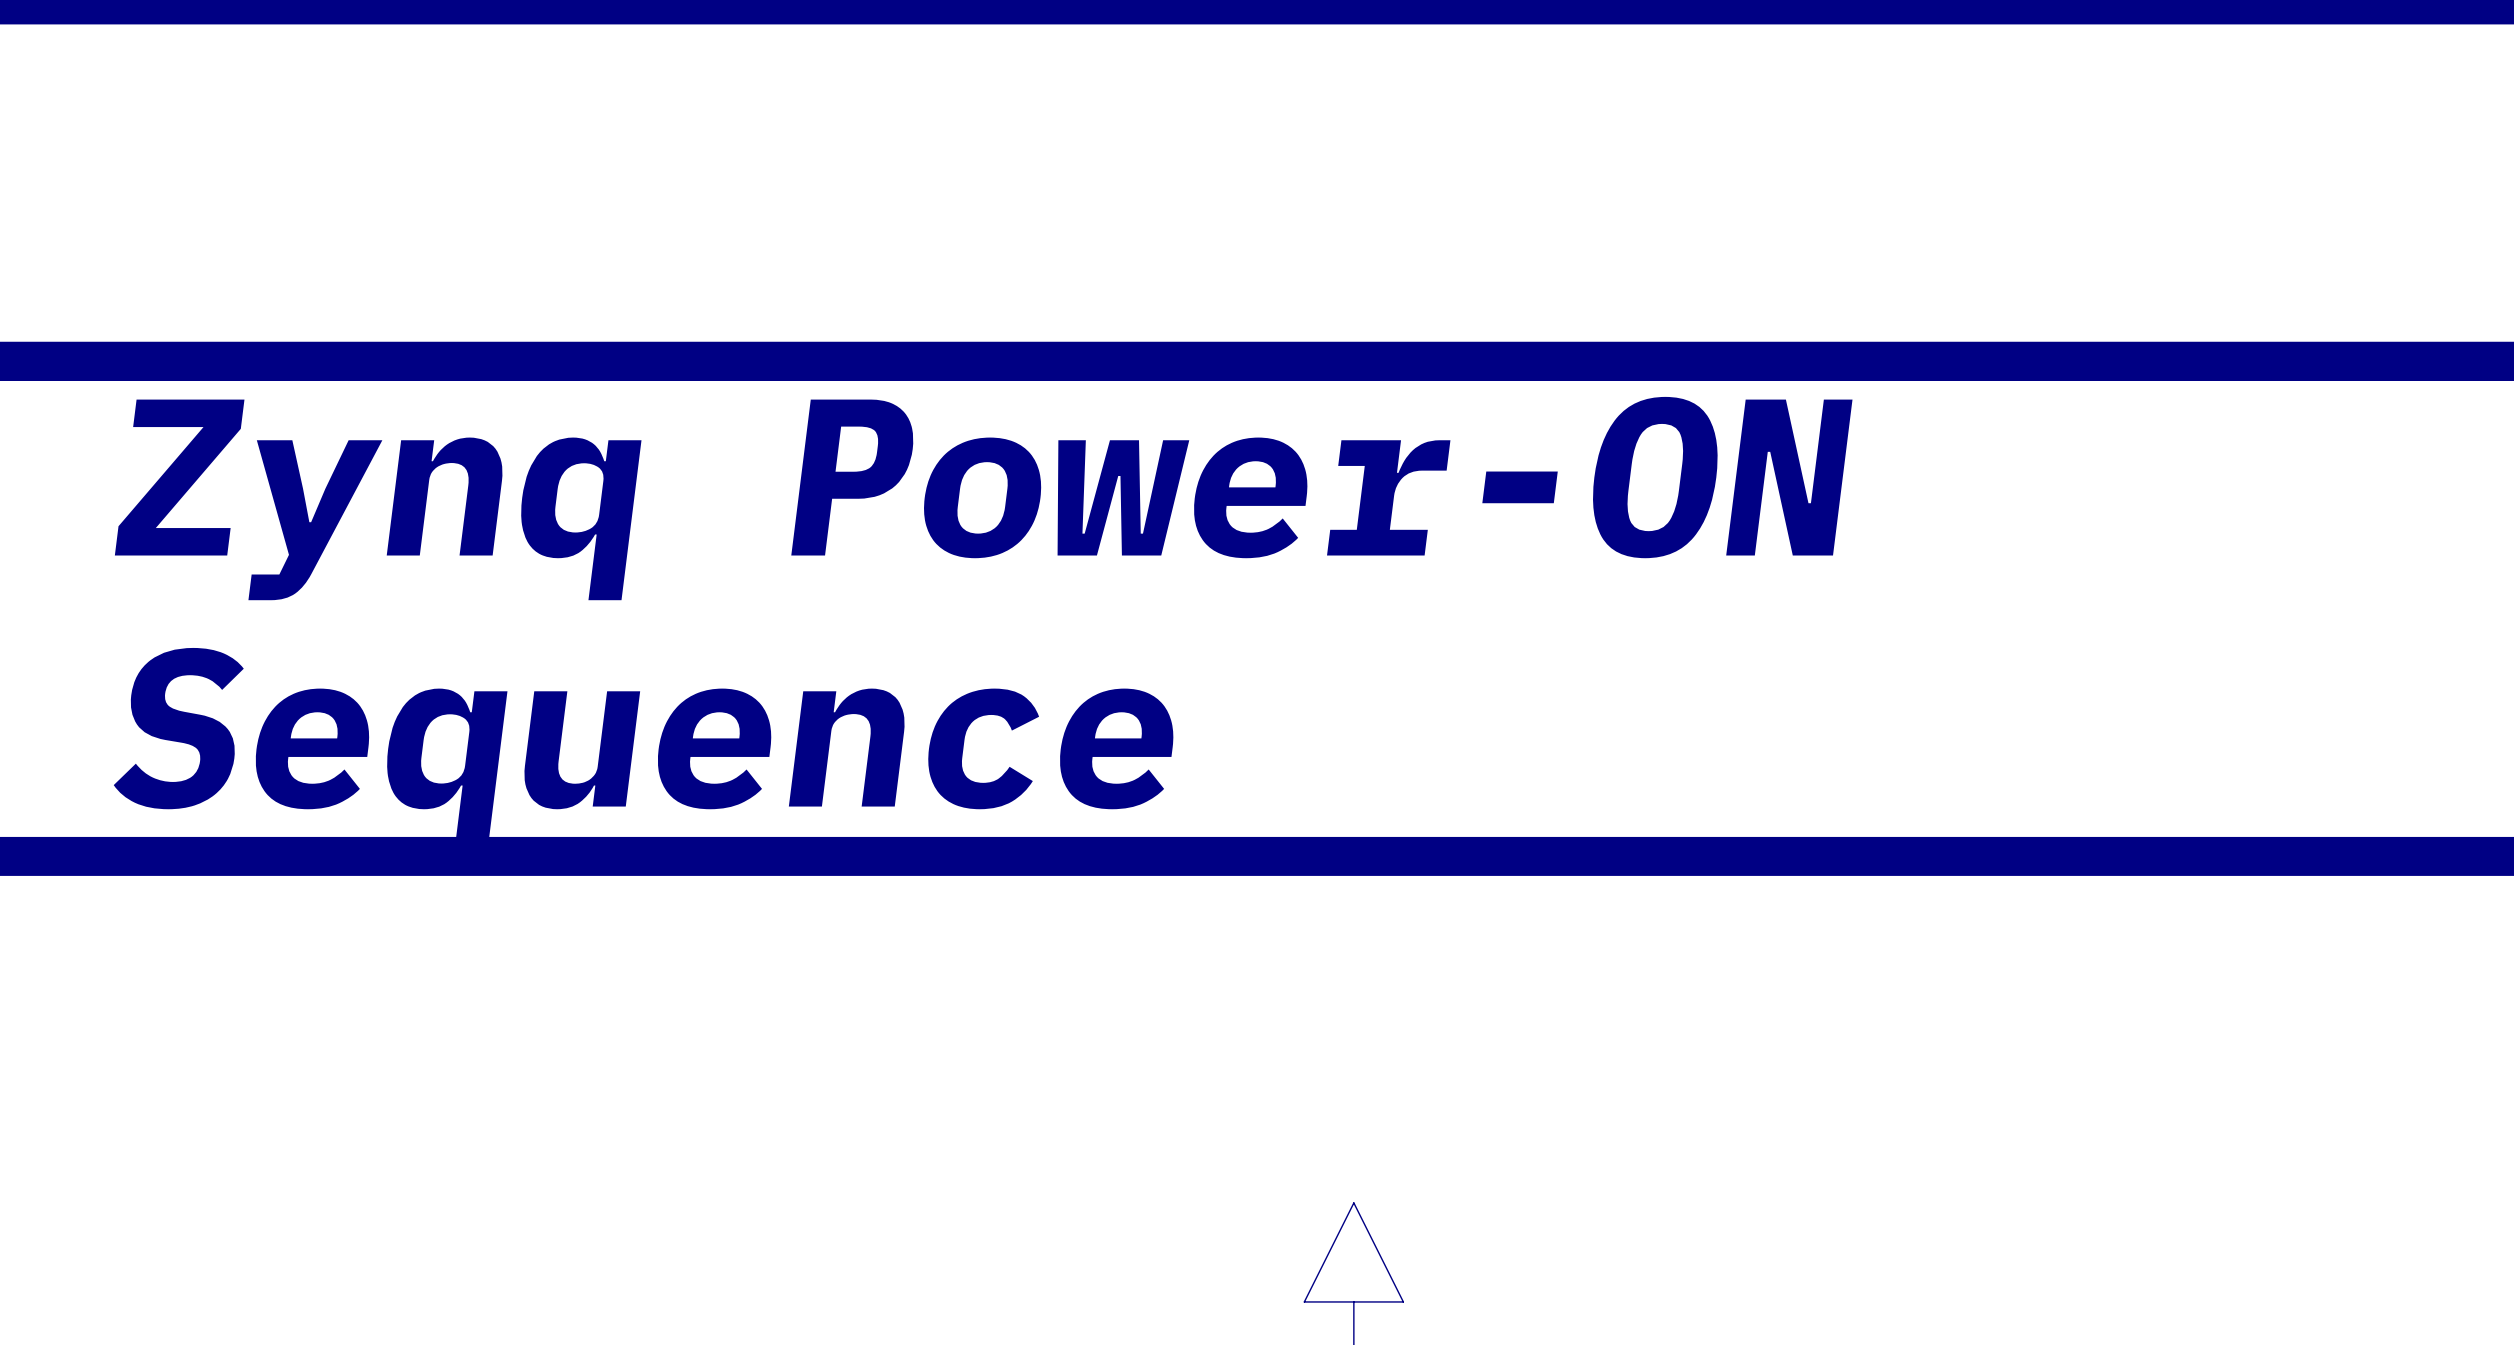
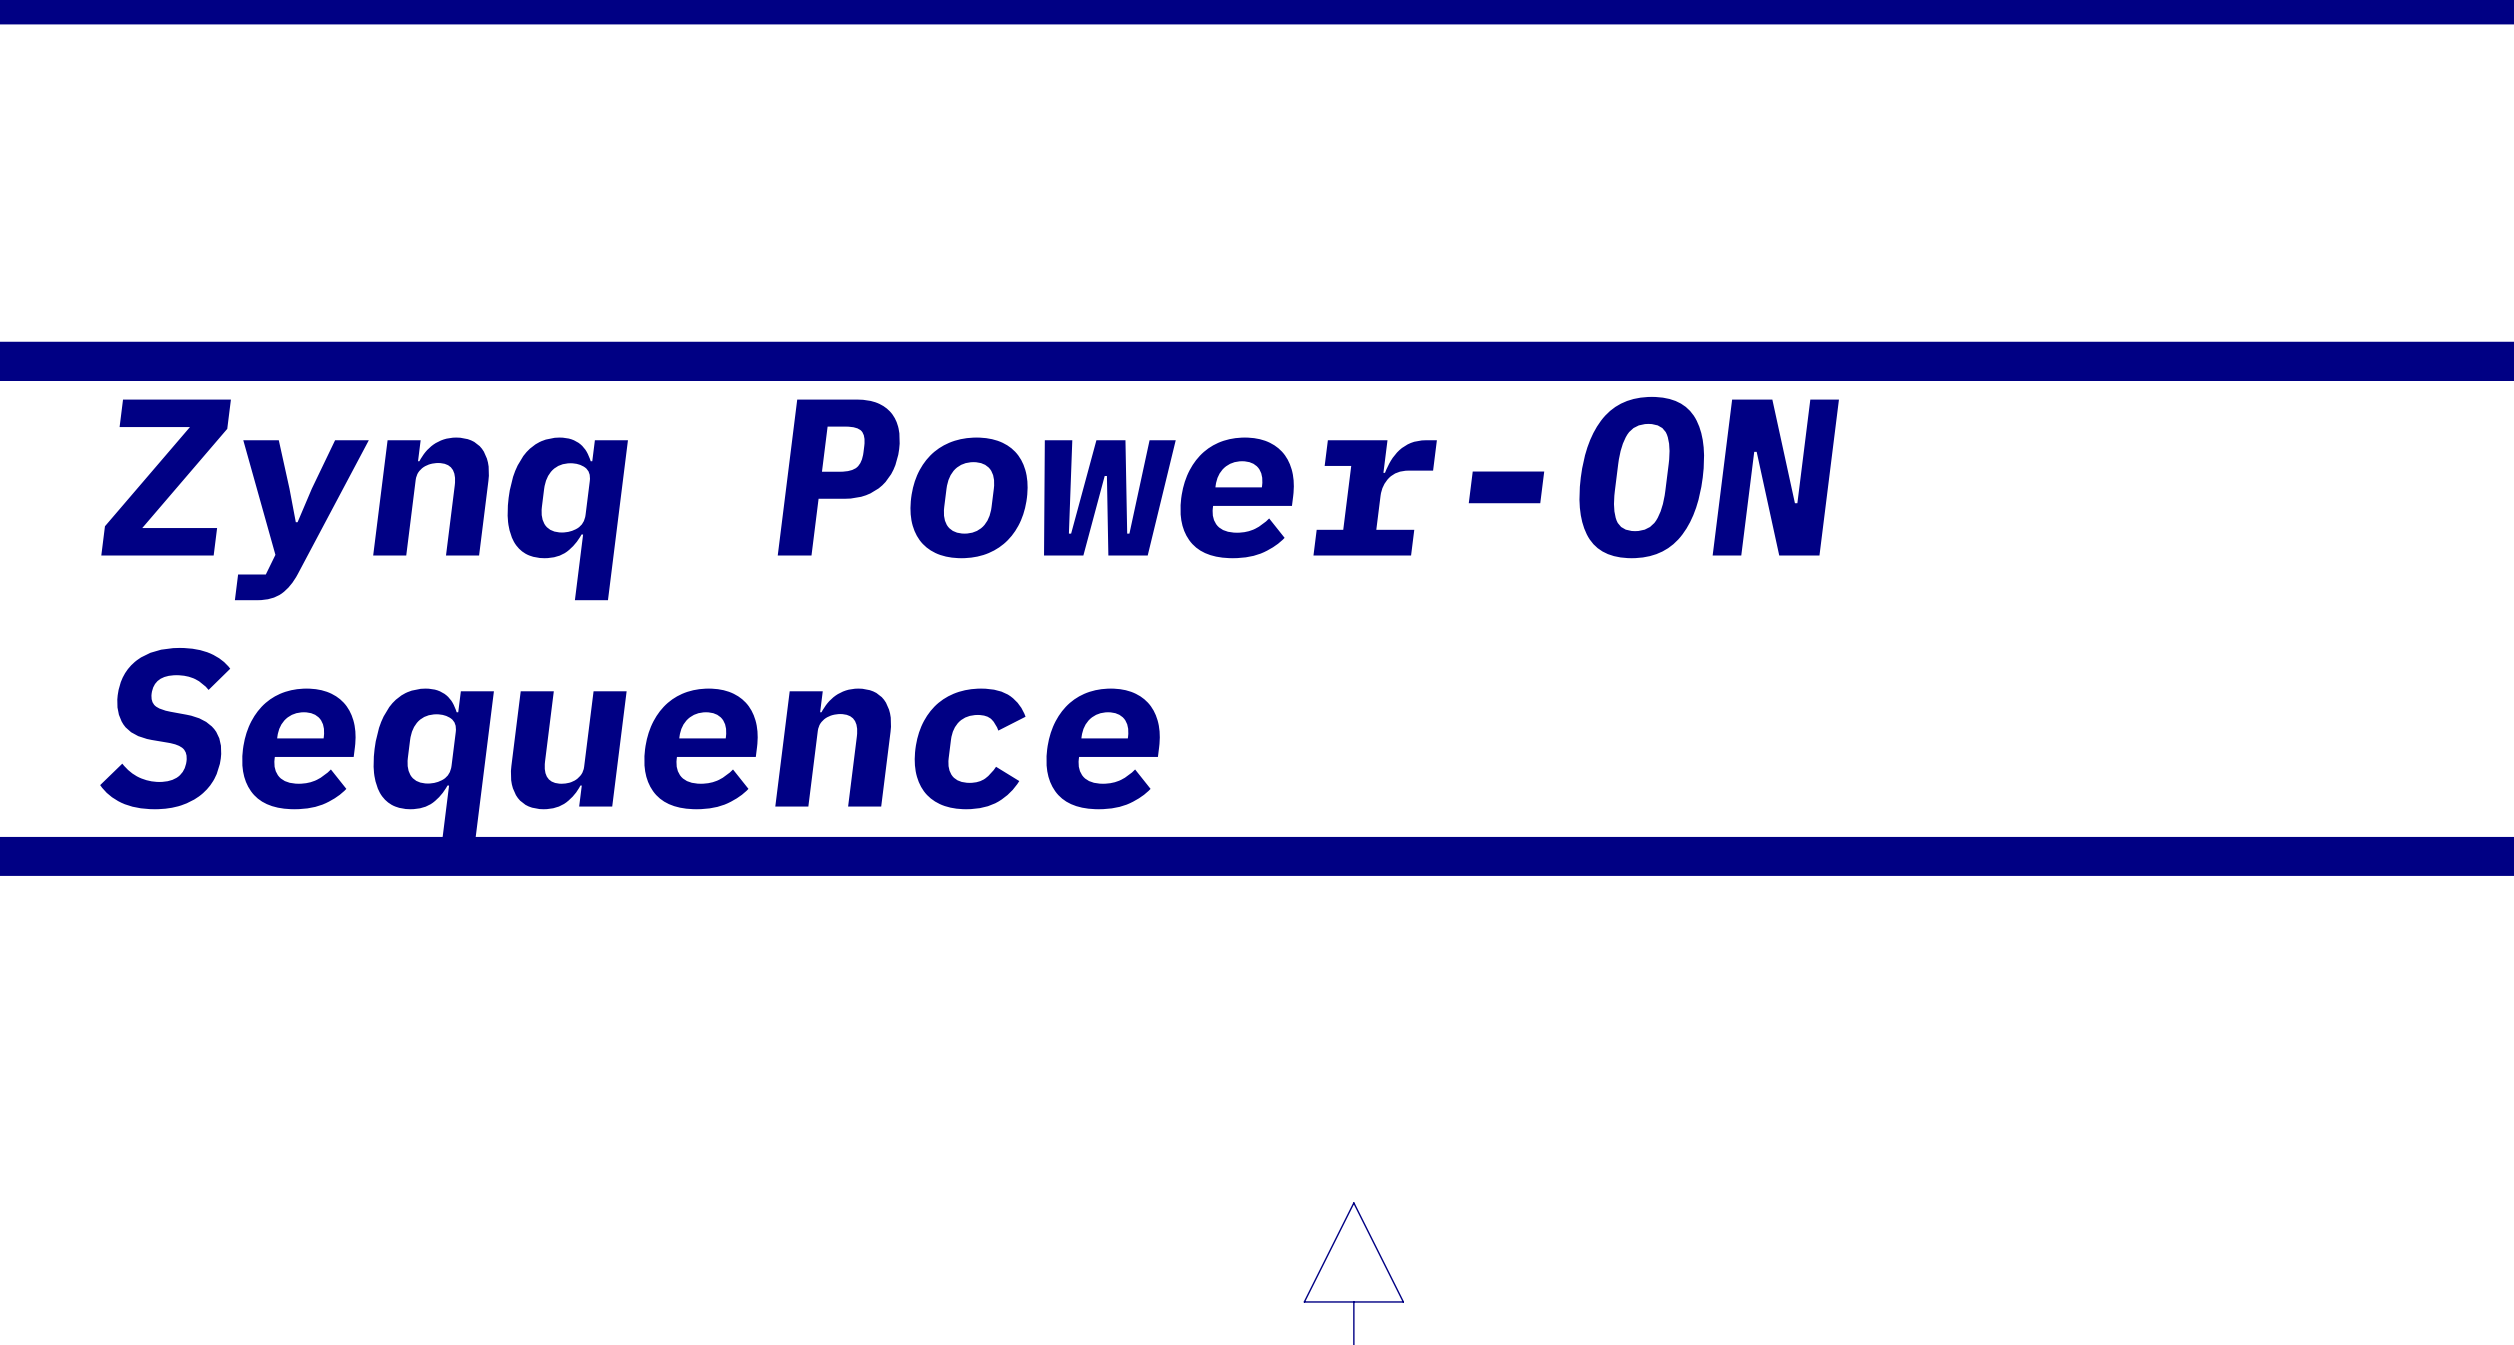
text position: Zynq Power-ON (983, 498) -> Zynq Power-ON (970, 498)
text position: Sequence (644, 749) -> Sequence (630, 749)

